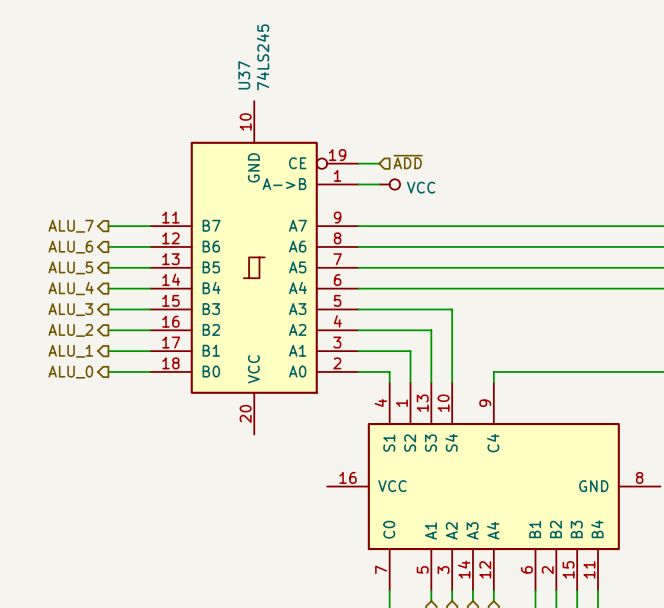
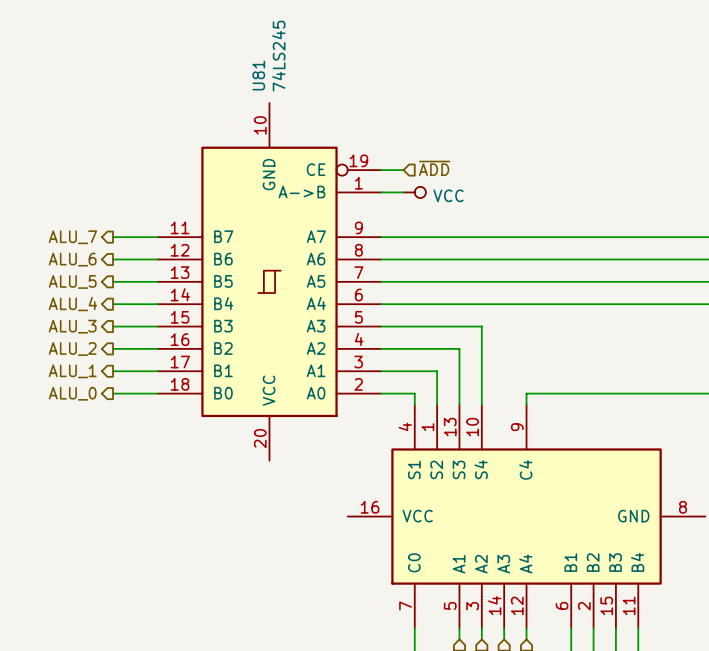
U37 name: U37 (244, 75) -> U81 (258, 75)

